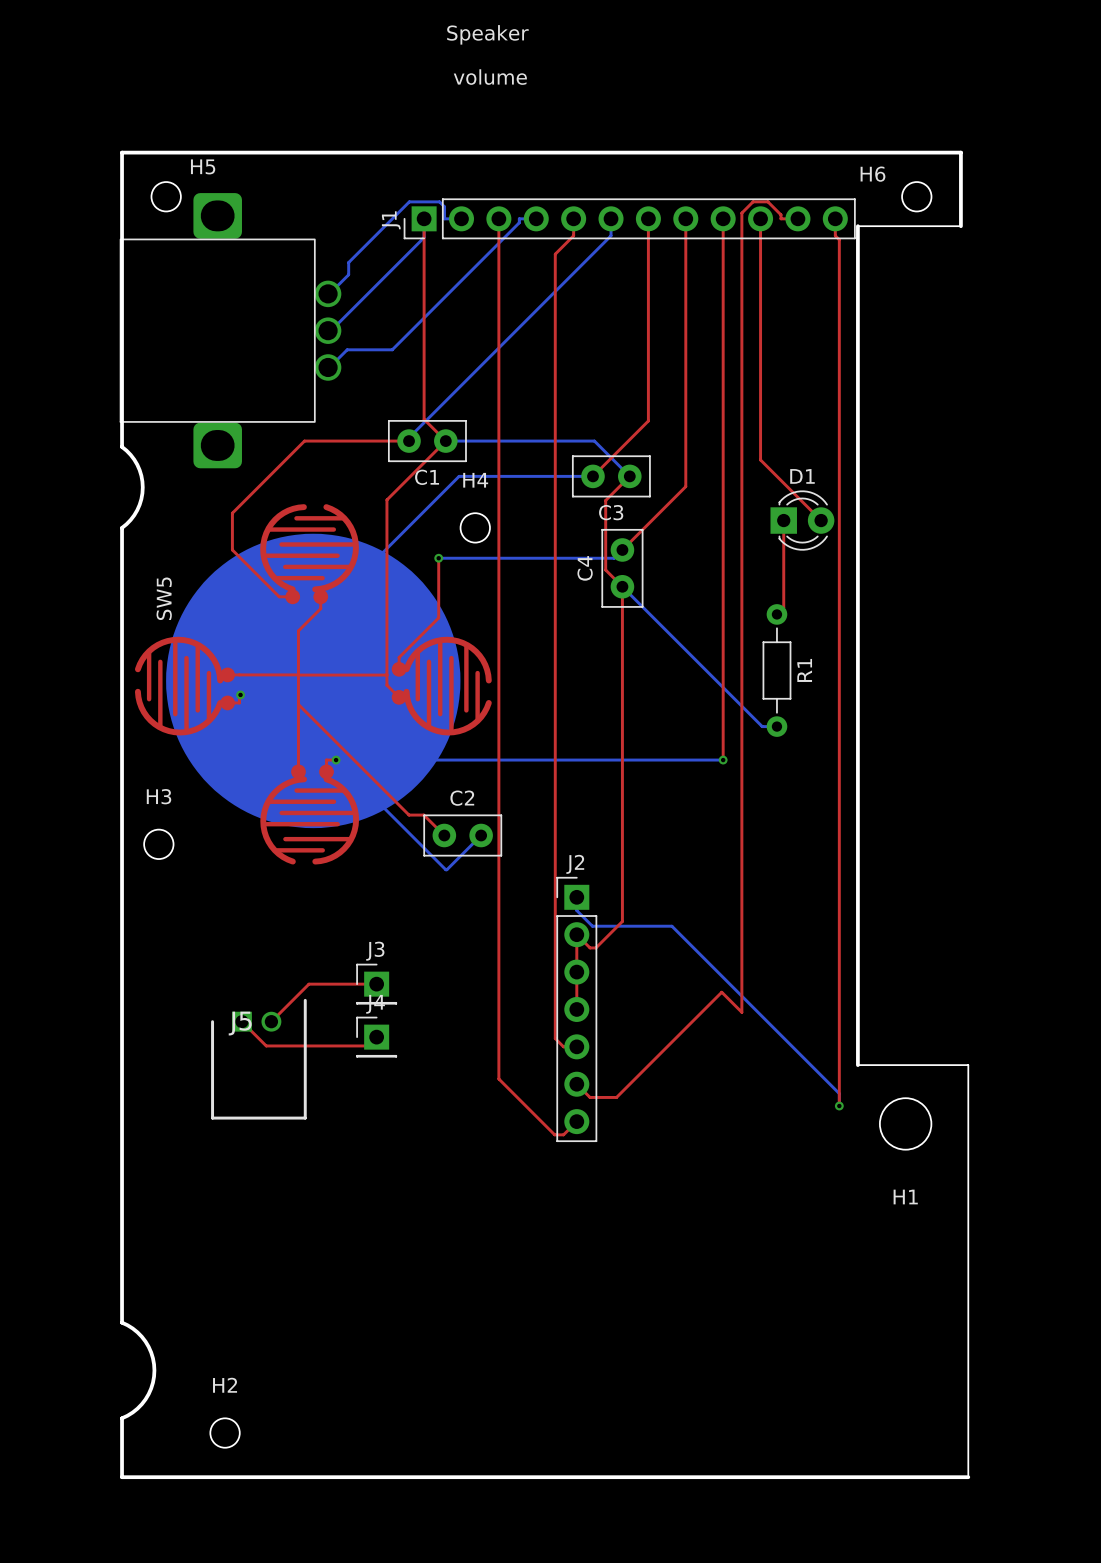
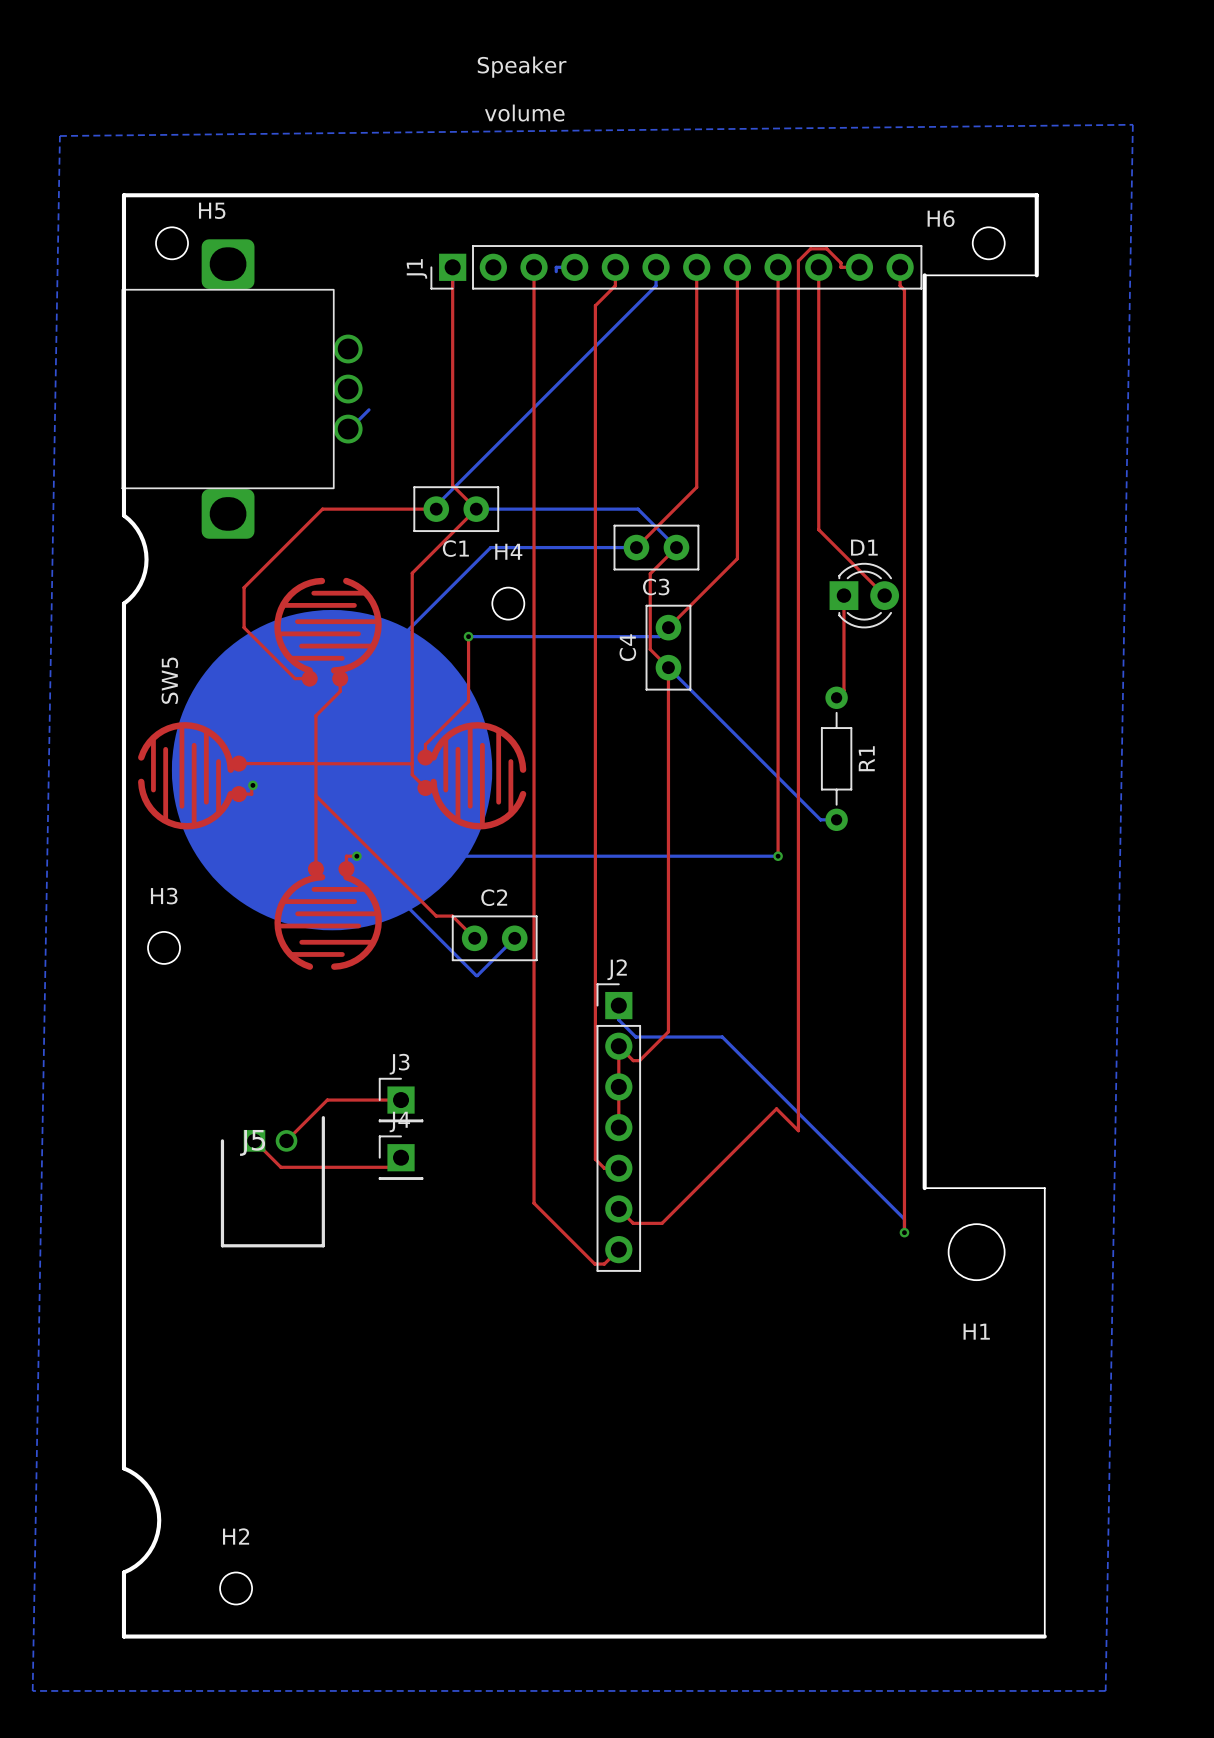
bottom zone outline: none -> (1132, 124) (59, 136) (32, 1690) (1105, 1690) (1132, 124)
bottom track: (461, 218) (444, 218) (444, 206) (439, 201) (409, 201) (348, 262) (348, 274) (328, 293) -> none
bottom track: (519, 222) (392, 349) (347, 349) -> none
bottom track: (424, 237) (331, 330) -> none

